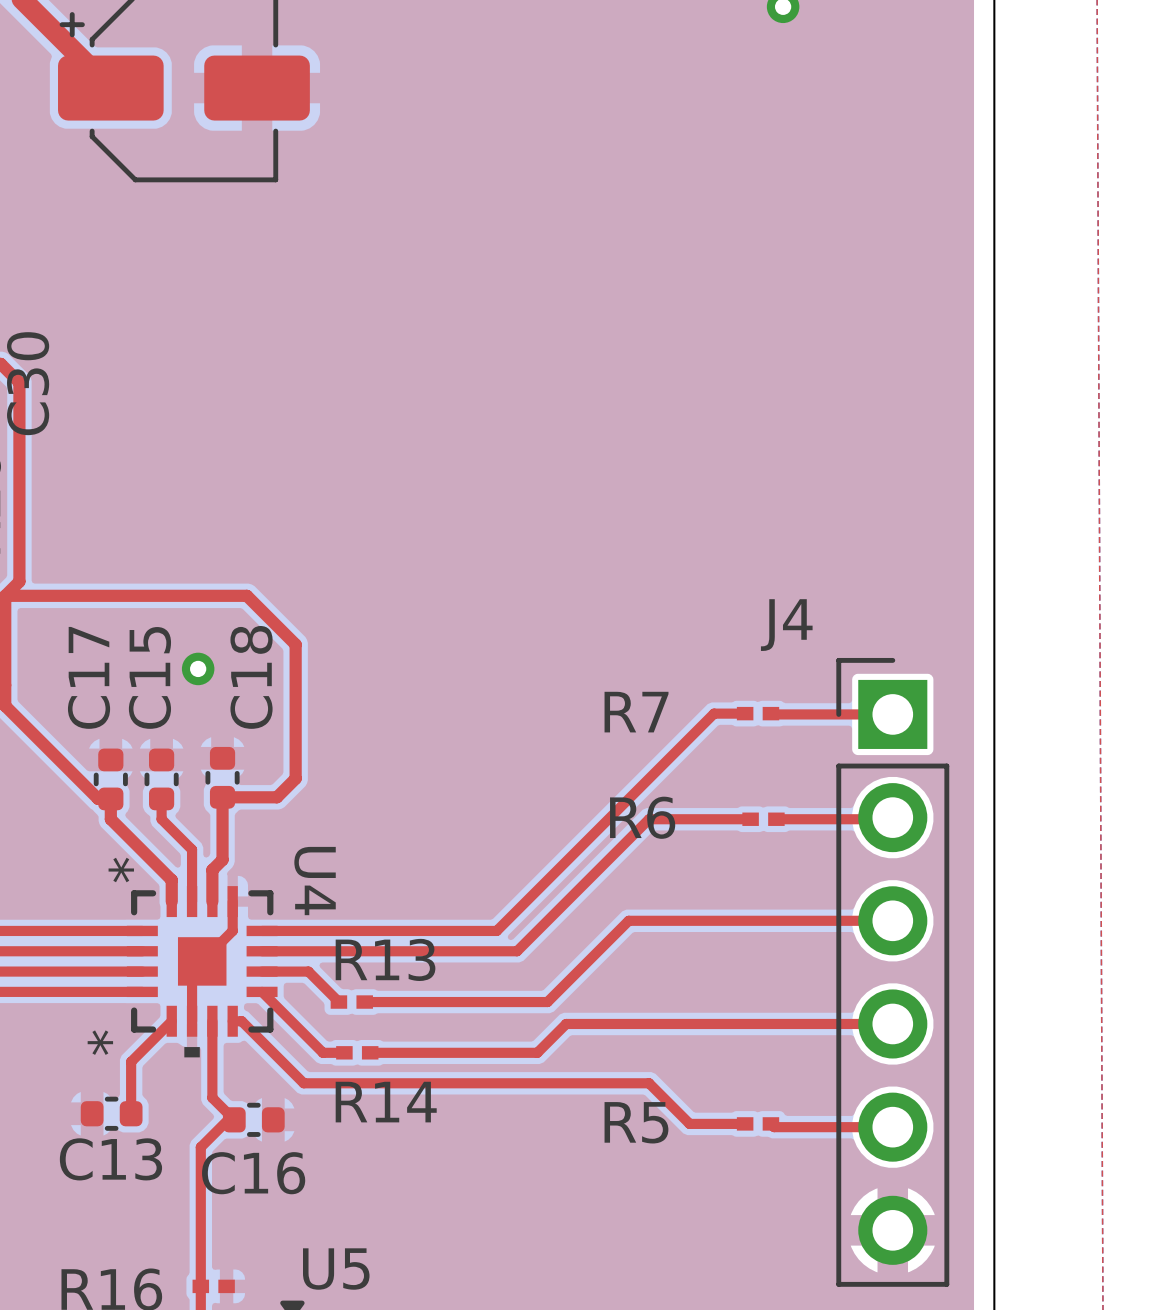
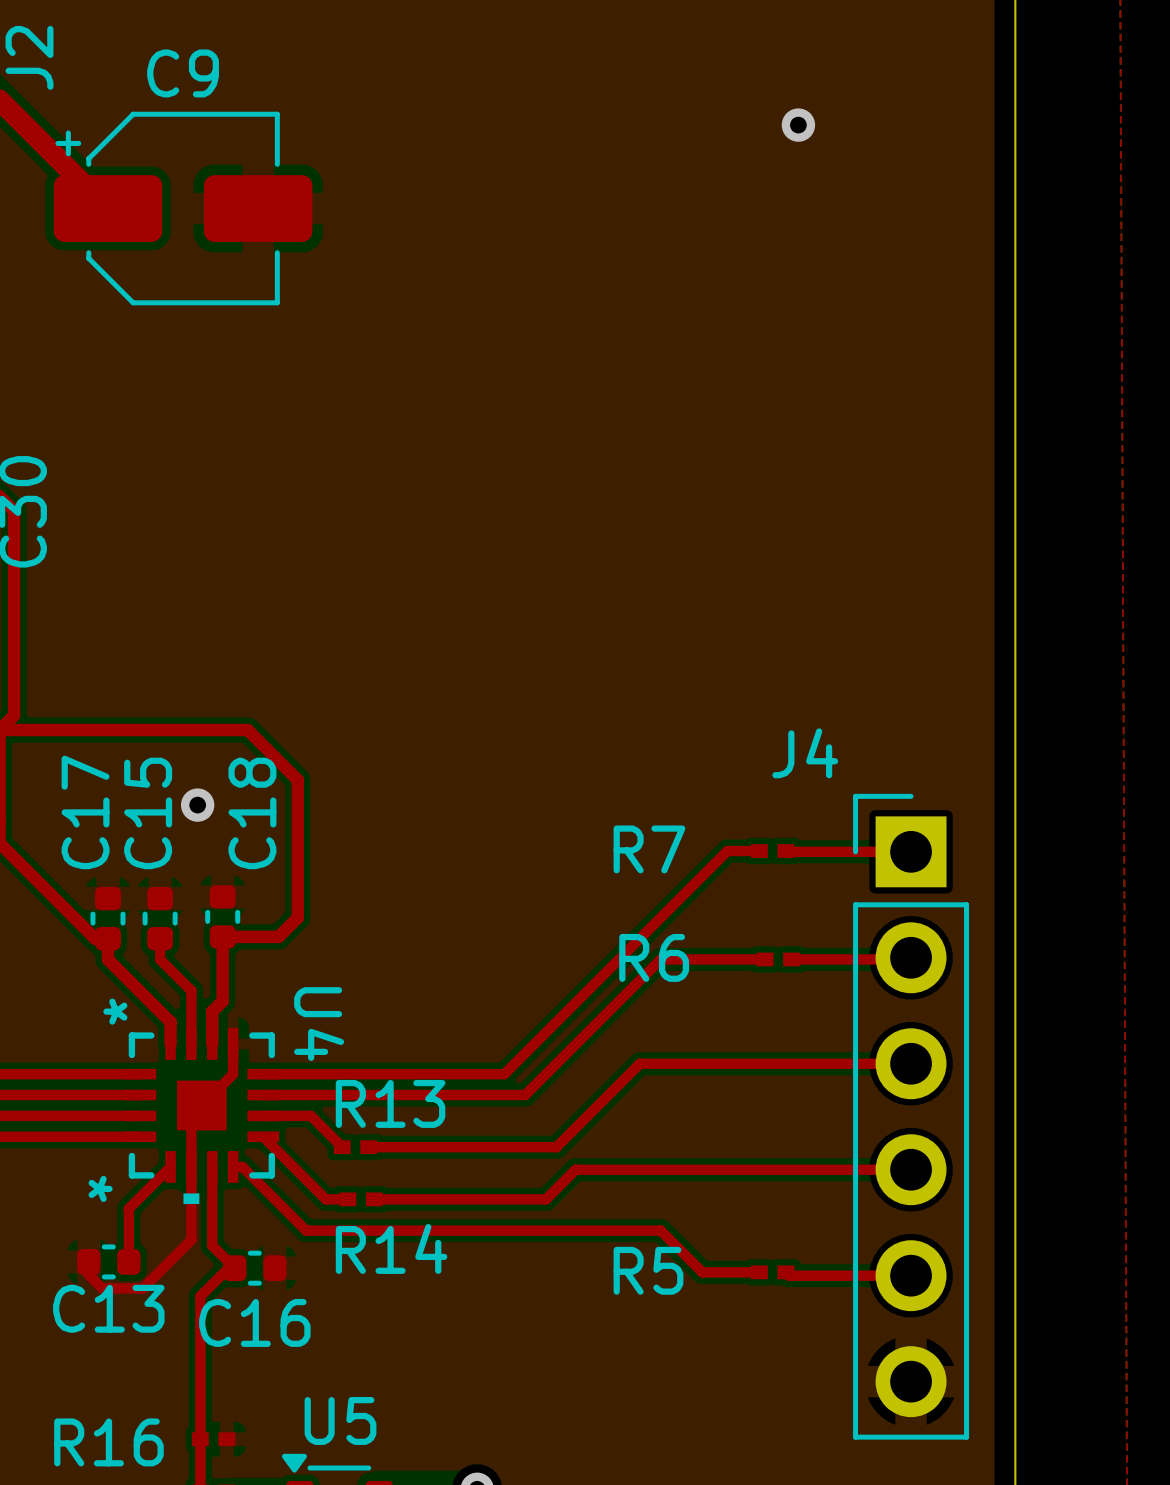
top track: none -> (191, 1166) (191, 1239) (142, 1288) (102, 1288) (88, 1274) (88, 1261)

